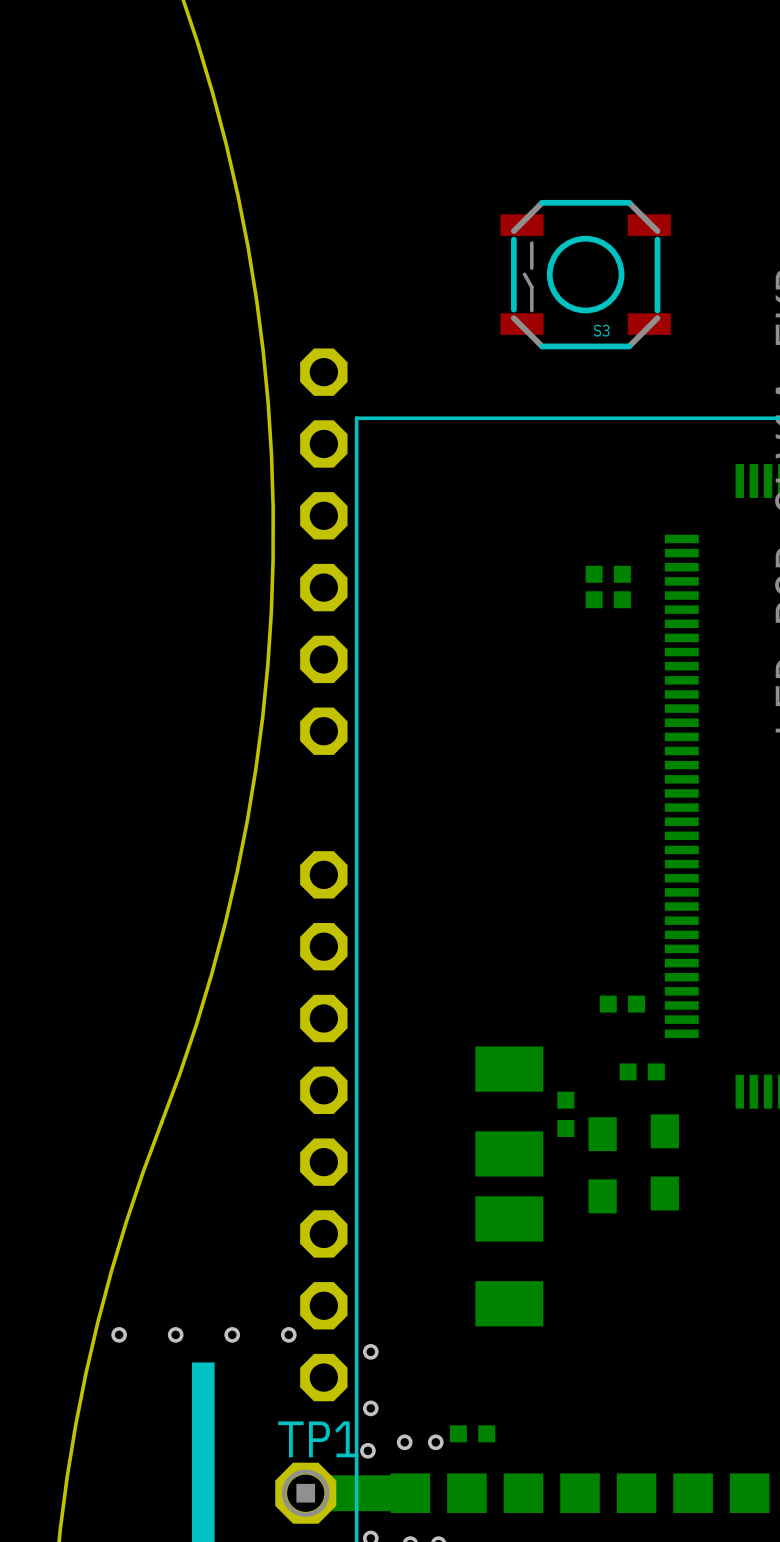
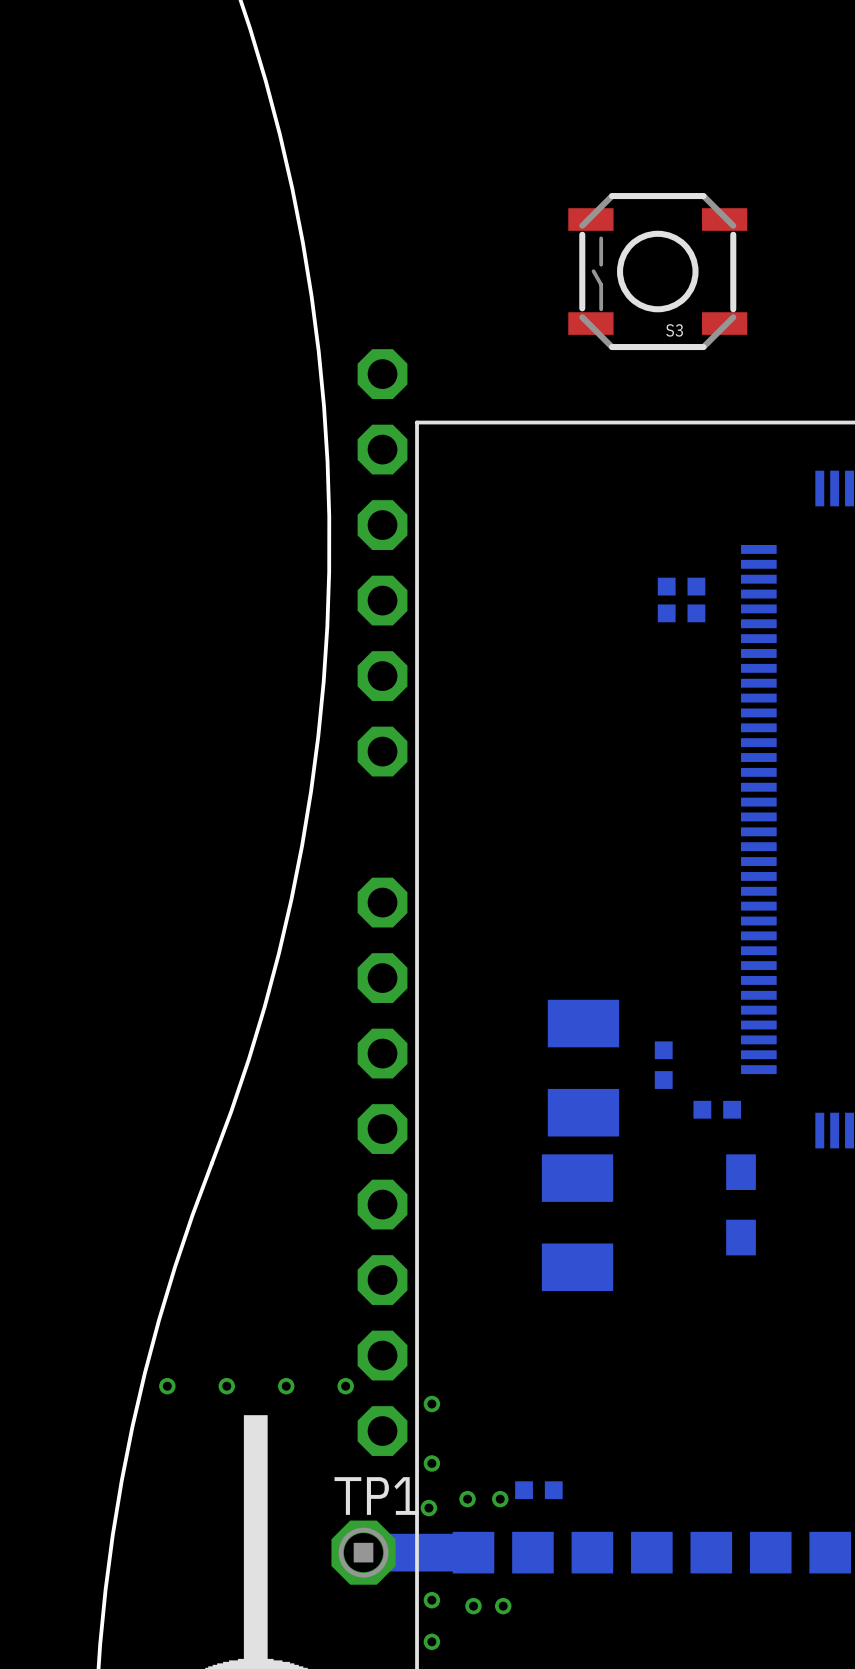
part rotation: 0° (622, 1004) -> 90° clockwise (663, 1065)
part position: (622, 1004) -> (663, 1065)
part: none -> (583, 1068)
part: (509, 1111) -> none
part: (565, 1114) -> none
part: (602, 1165) -> none
part: none -> (577, 1222)
part: (509, 1261) -> none

